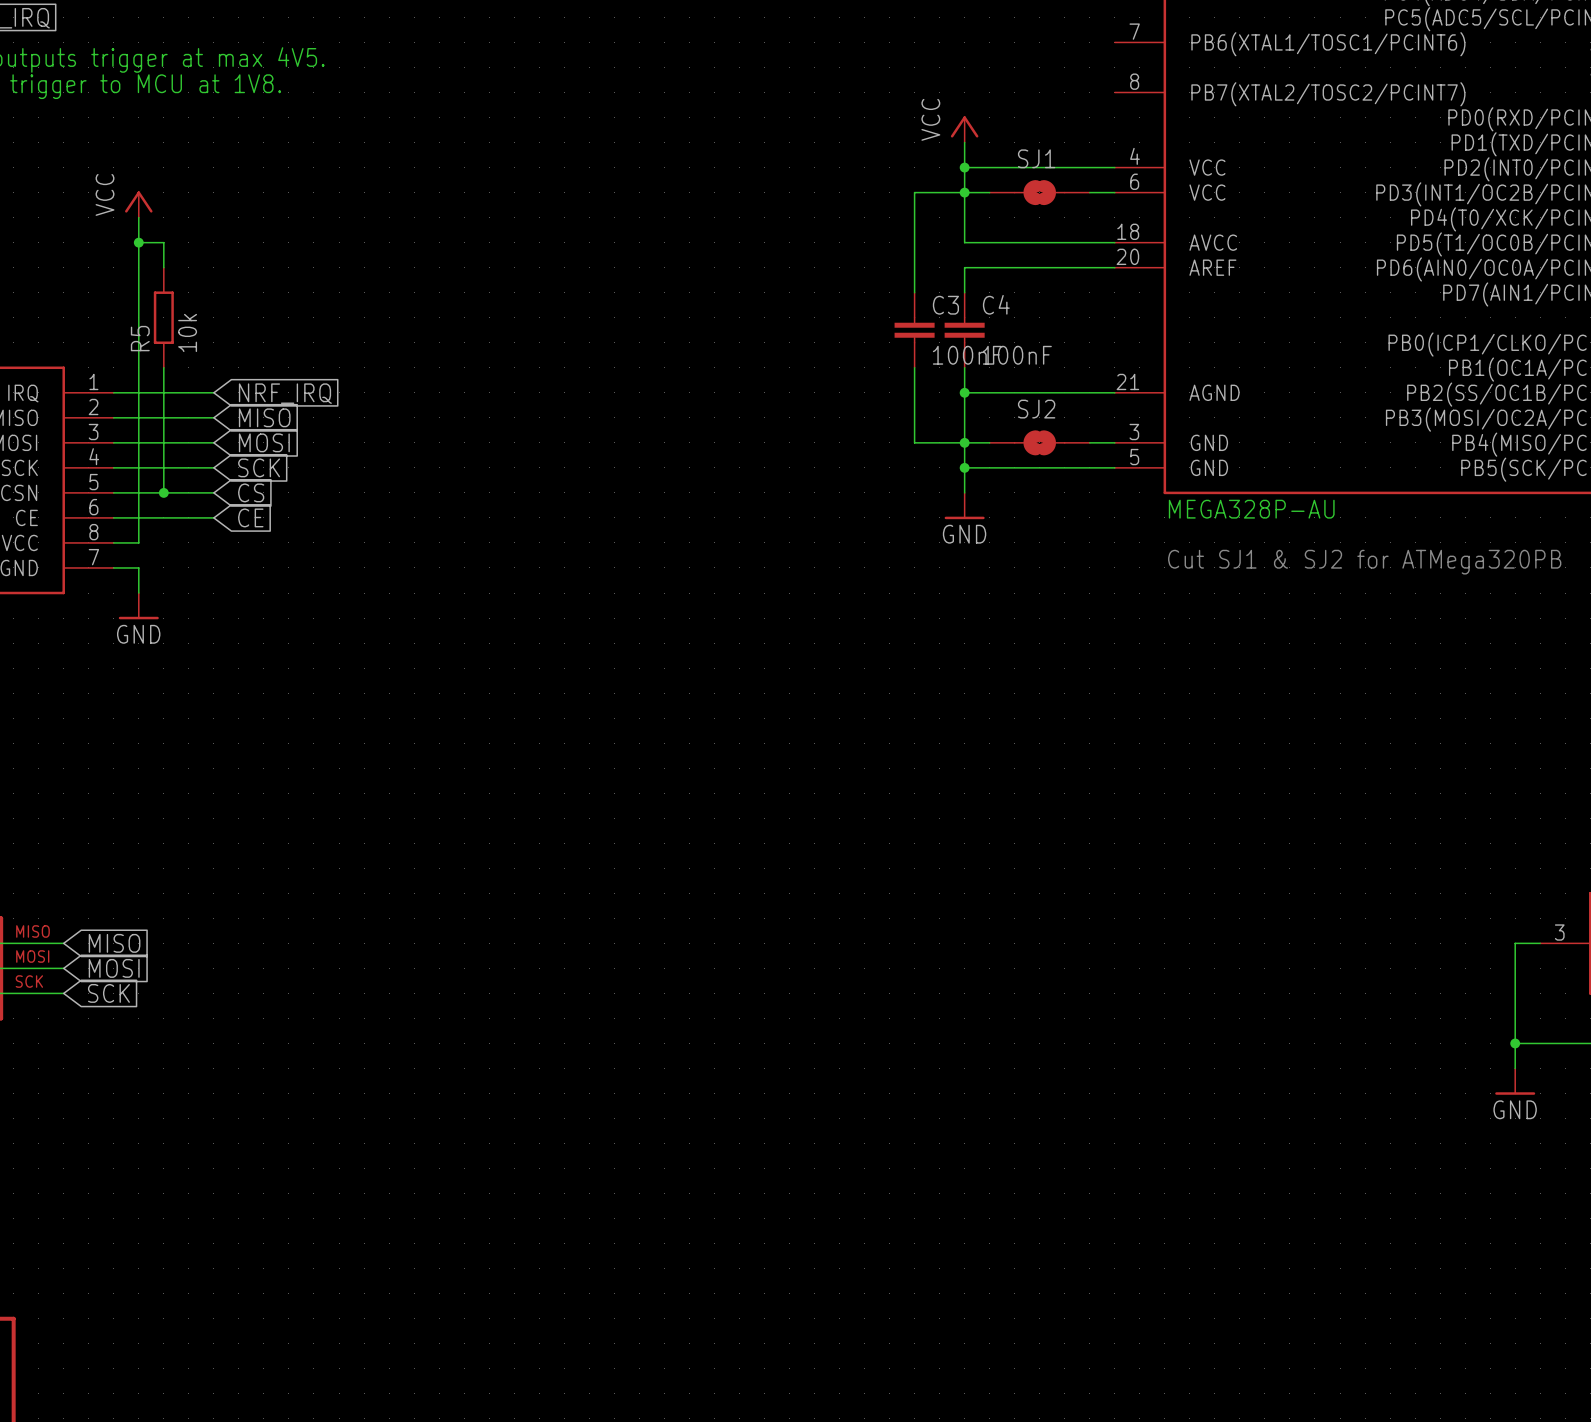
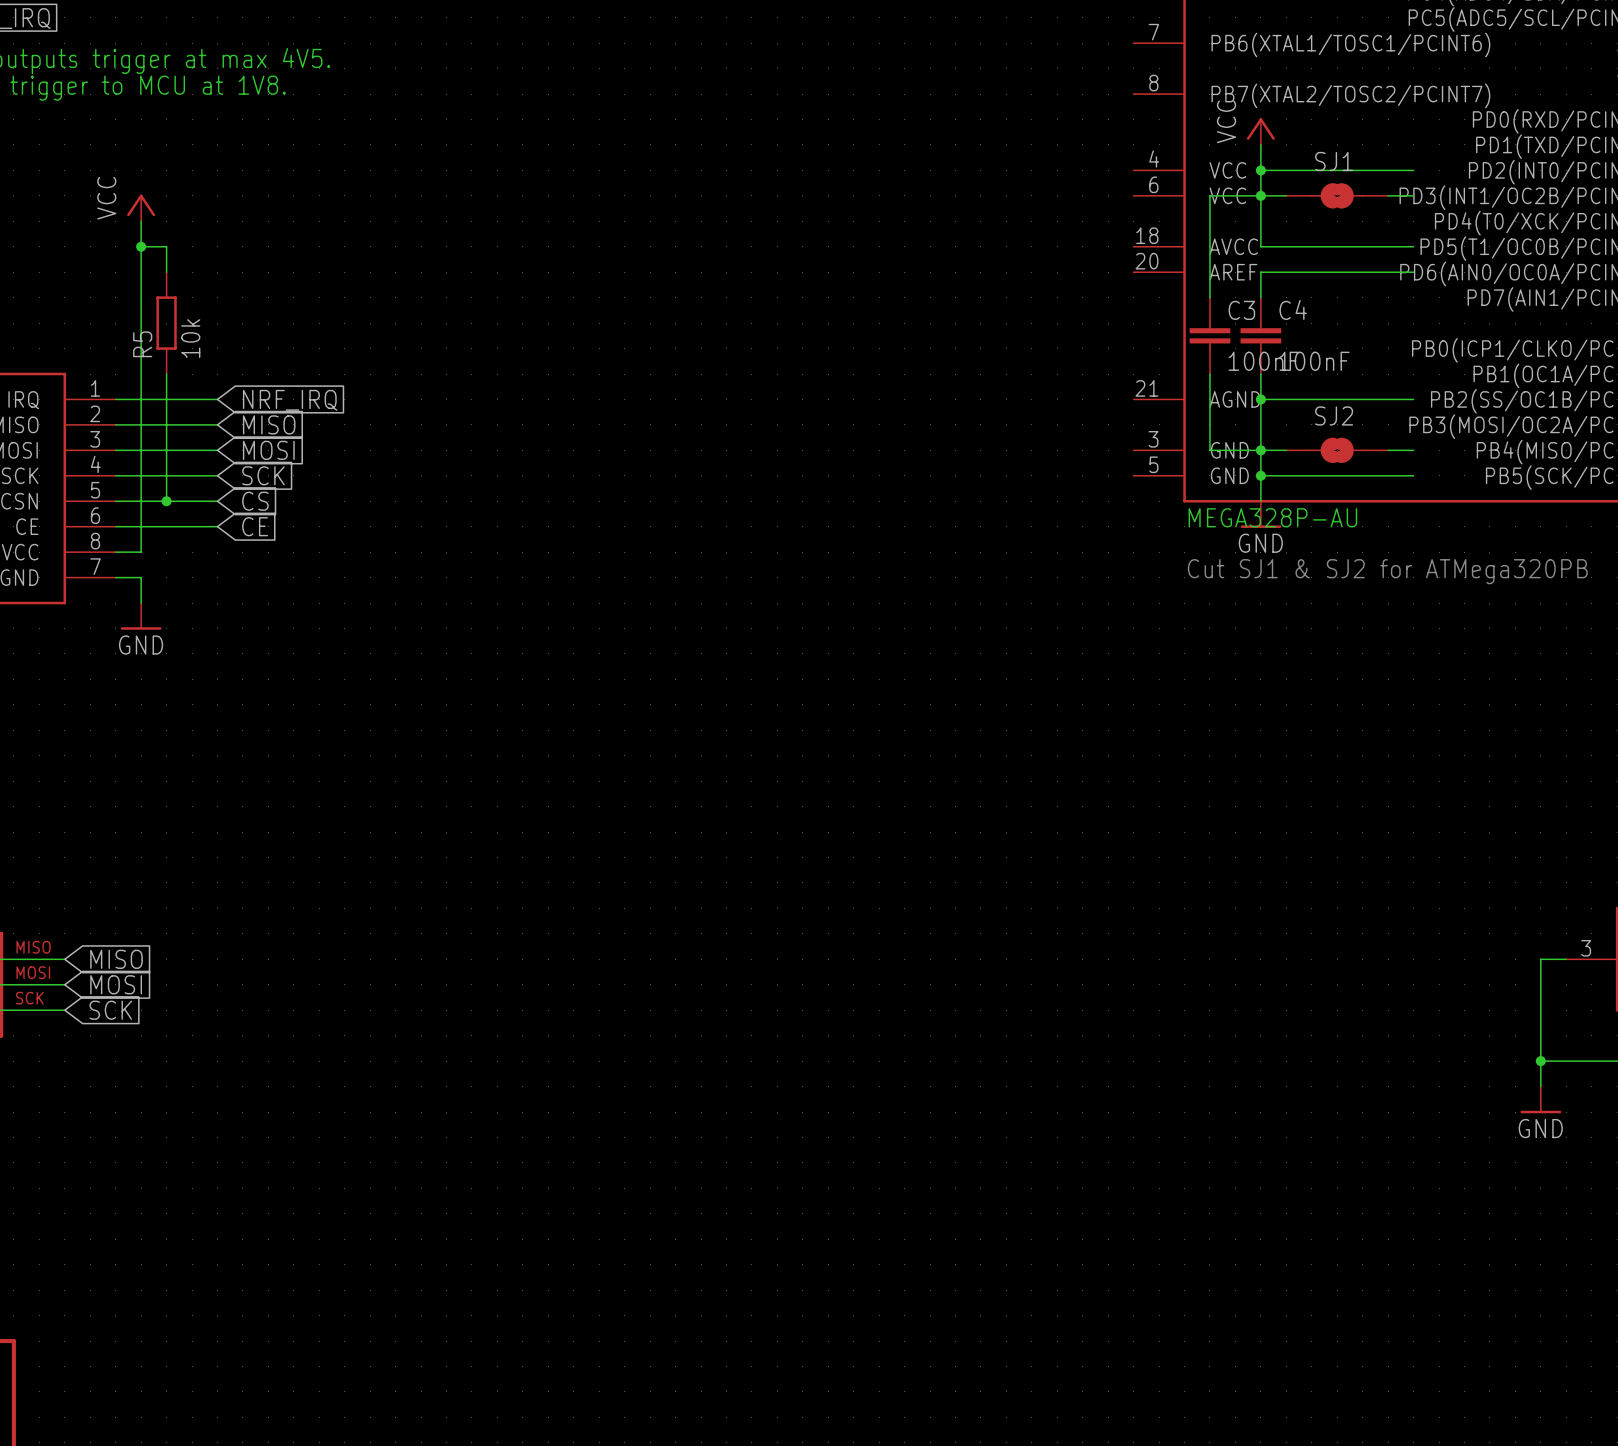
power symbol: VCC (964, 129) -> none
power symbol: none -> VCC (1260, 131)
wire: (964, 142) (964, 242) (1114, 242) -> none
wire: none -> (1260, 144) (1260, 246) (1413, 246)
wire: (964, 167) (1114, 167) -> none
junction: (964, 167) -> none
wire: none -> (1260, 170) (1413, 170)
junction: none -> (1260, 170)
junction: (964, 192) -> none
wire: (989, 192) (914, 192) (914, 292) -> none
SJ1 position: (1039, 192) -> (1337, 195)
wire: (1089, 192) (1114, 192) -> none
junction: none -> (1260, 195)
wire: none -> (1286, 195) (1209, 195) (1209, 297)
wire: none -> (1388, 195) (1413, 195)
wire: (1114, 267) (964, 267) (964, 292) -> none
wire: none -> (1413, 272) (1260, 272) (1260, 297)
C3 position: (914, 330) -> (1209, 335)
C4 position: (964, 330) -> (1260, 335)
wire: (914, 367) (914, 442) (989, 442) -> none
wire: (964, 367) (964, 492) -> none
wire: none -> (1209, 374) (1209, 450) (1286, 450)
wire: none -> (1260, 374) (1260, 501)
wire: (964, 392) (1114, 392) -> none
junction: (964, 392) -> none
wire: none -> (1260, 399) (1413, 399)
junction: none -> (1260, 399)
junction: (964, 442) -> none
SJ2 position: (1039, 442) -> (1337, 450)
wire: (1089, 442) (1114, 442) -> none
junction: none -> (1260, 450)
wire: none -> (1388, 450) (1413, 450)
wire: (964, 467) (1114, 467) -> none
junction: (964, 467) -> none
wire: none -> (1260, 475) (1413, 475)
junction: none -> (1260, 475)
power symbol: GND (964, 506) -> none
power symbol: none -> GND (1260, 514)

